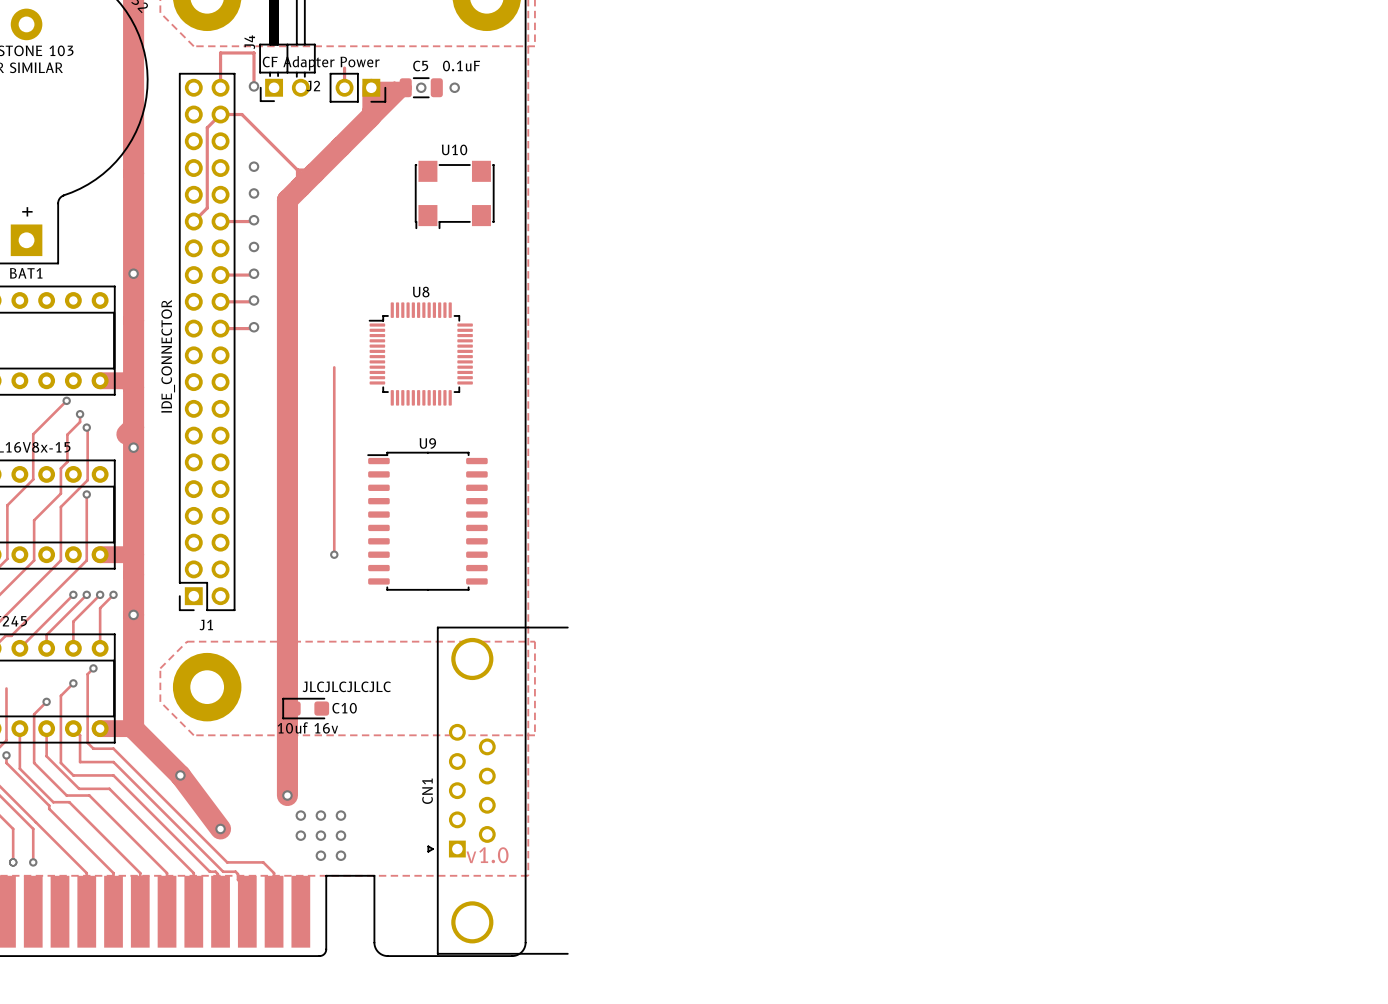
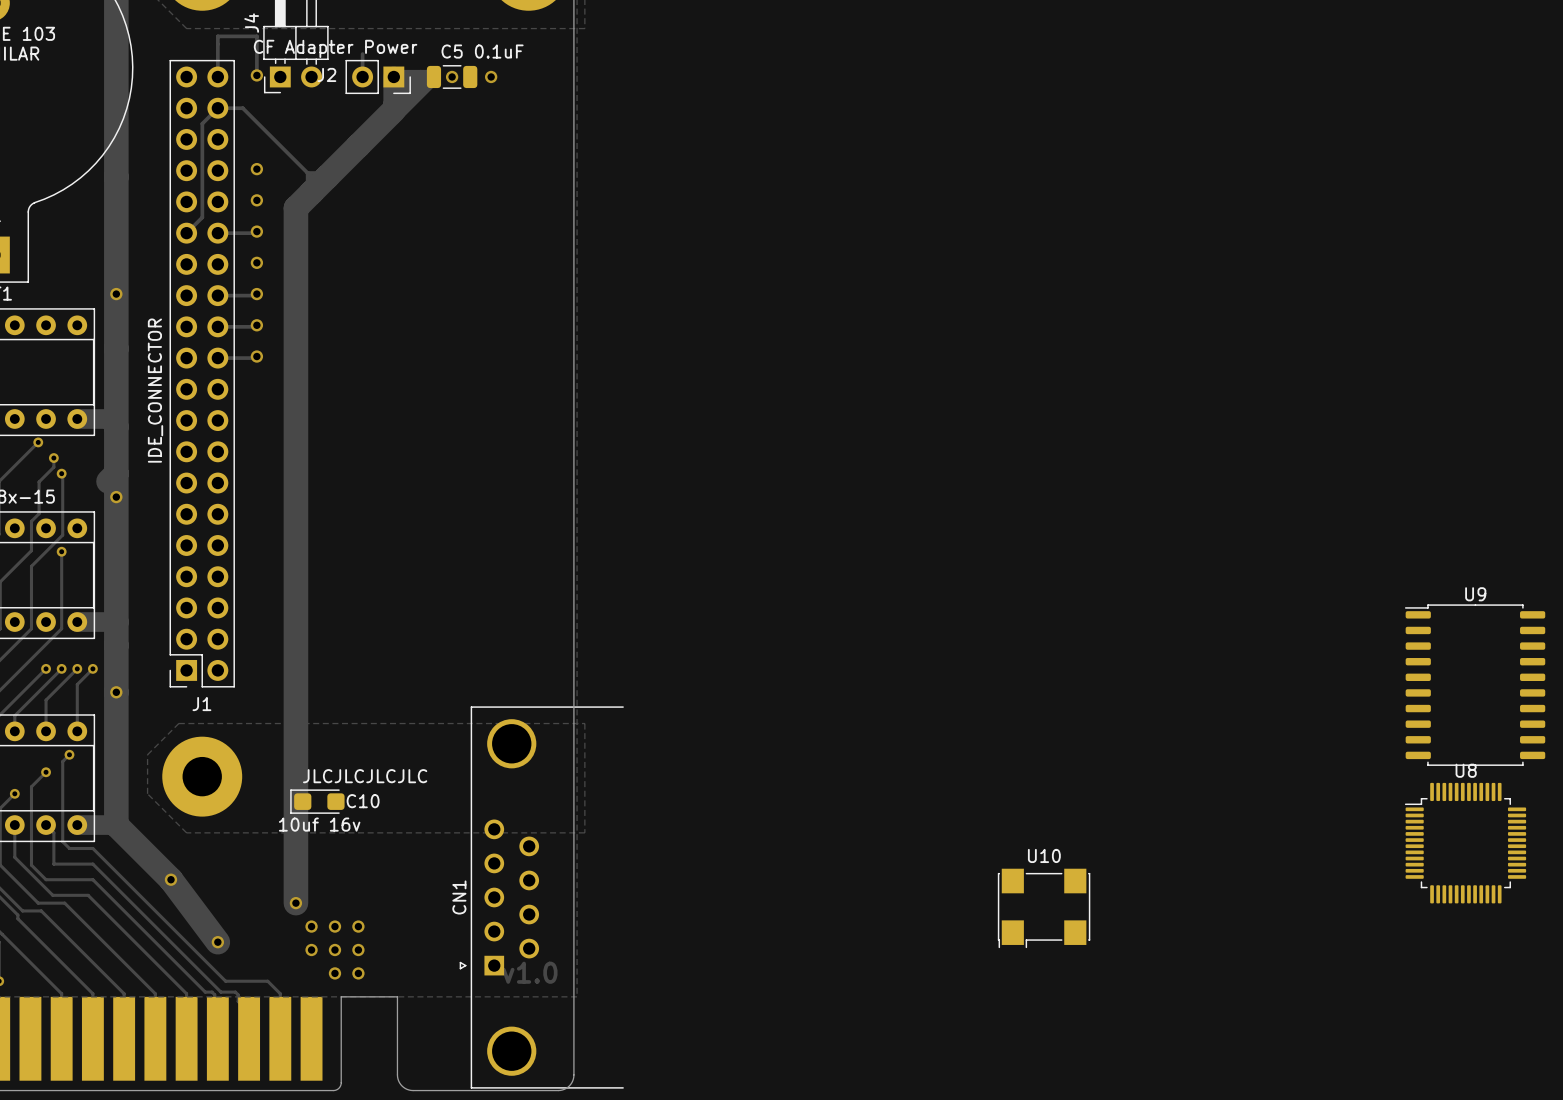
U10 position: (454, 194) -> (1044, 908)
U8 position: (420, 354) -> (1465, 843)
track: (334, 367) (334, 554) -> none
U9 position: (427, 521) -> (1475, 685)
via: (334, 554) -> none

